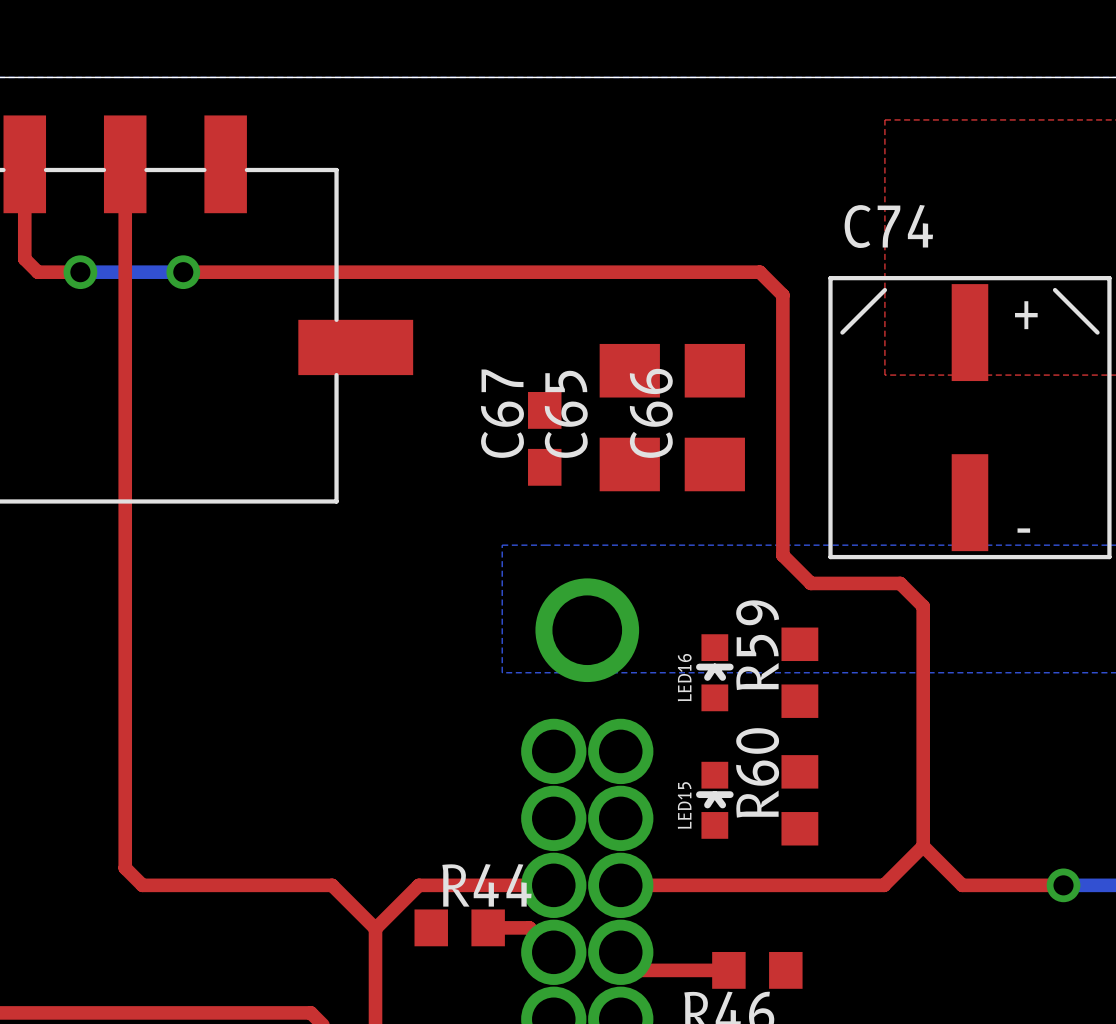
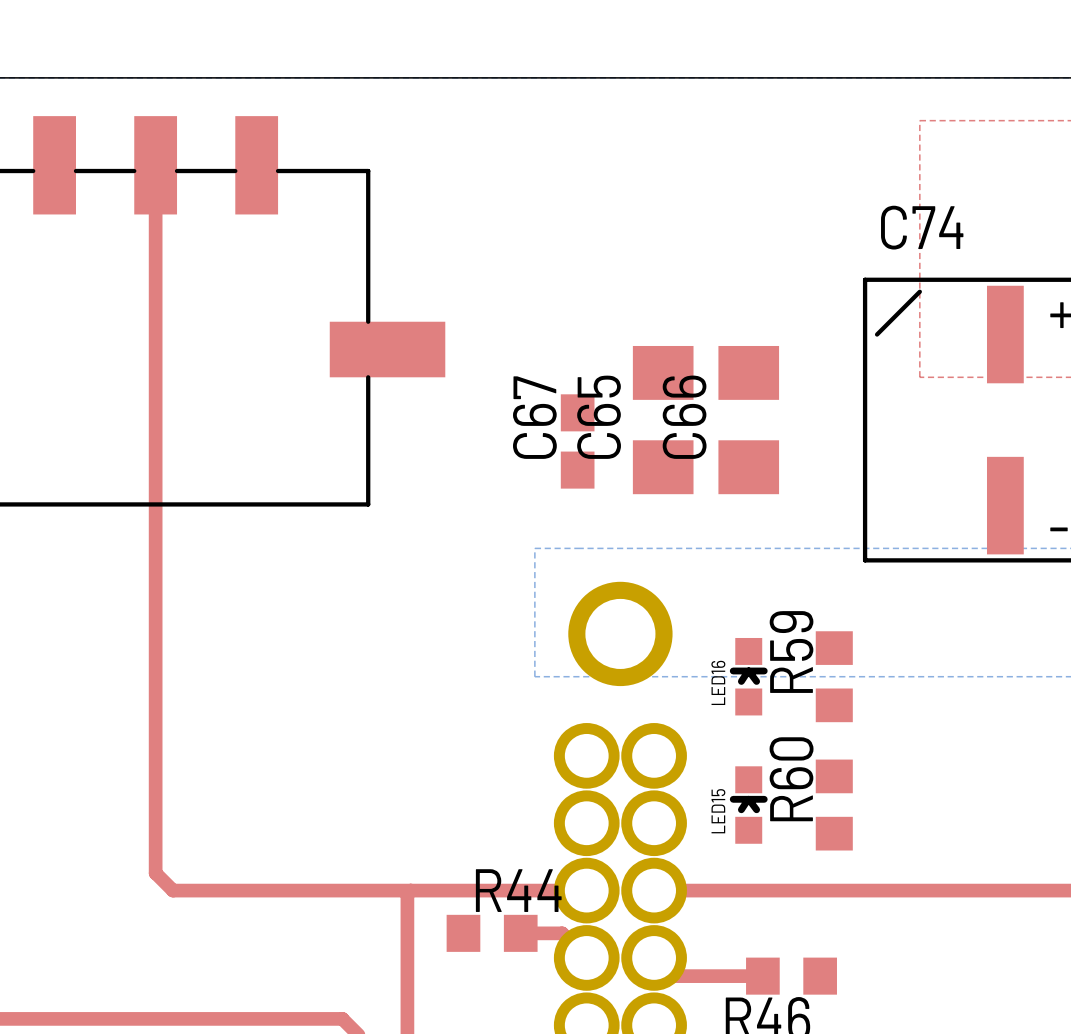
top track: (24, 164) (24, 259) (37, 272) (80, 272) -> none
bottom track: (80, 272) (183, 272) -> none
via: (80, 272) -> none
top track: (183, 272) (759, 272) (782, 295) (782, 555) (810, 583) (900, 583) (923, 606) (923, 846) -> none
via: (183, 272) -> none
top track: (923, 846) (884, 885) -> (997, 890) (918, 890)
top track: (923, 846) (962, 885) -> none
top track: (332, 885) (375, 928) (418, 885) -> (363, 890) (451, 890)
top track: none -> (410, 890) (407, 894) (407, 934)

